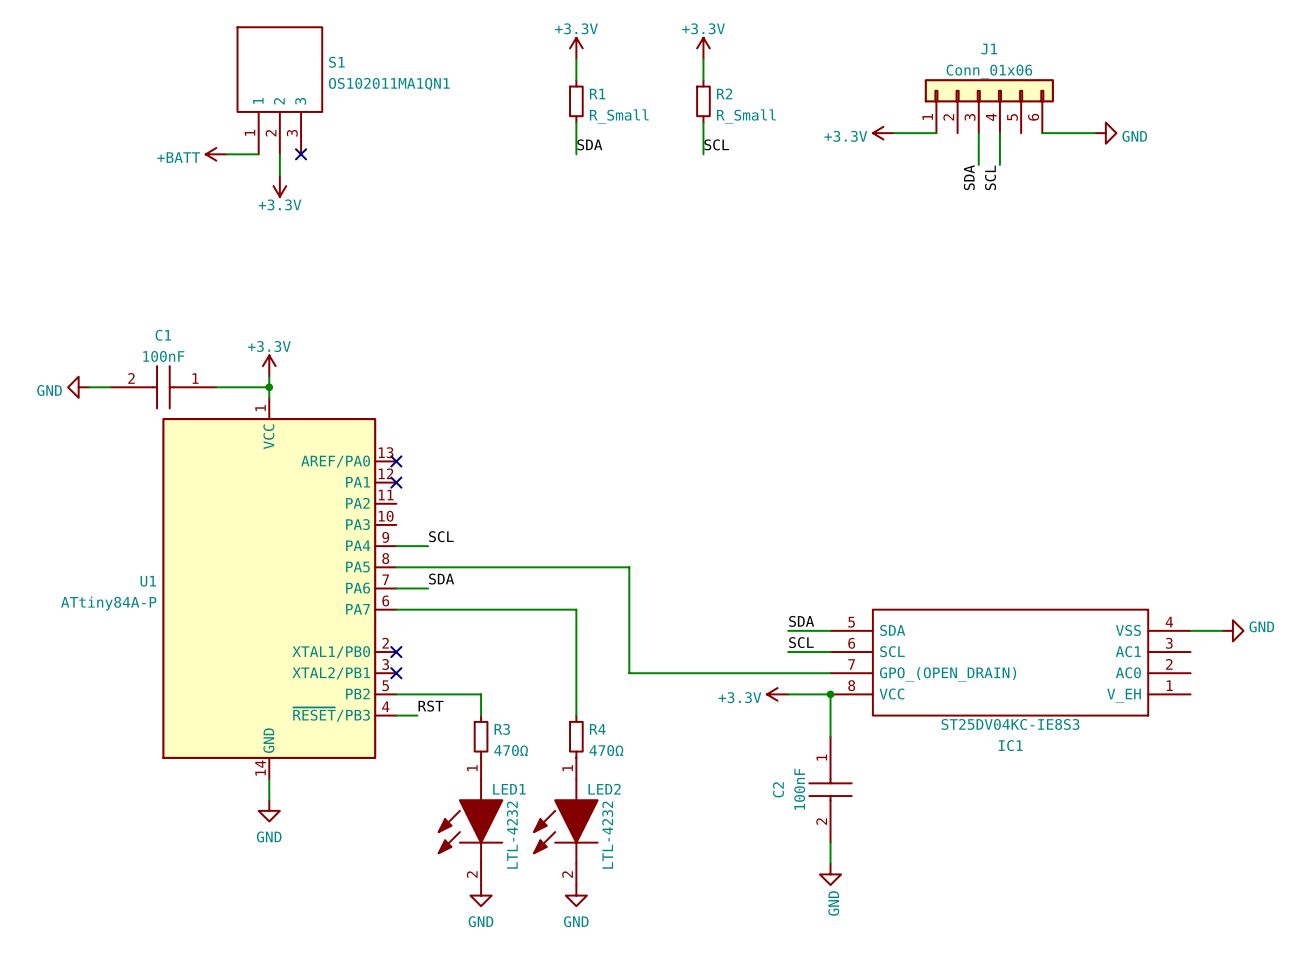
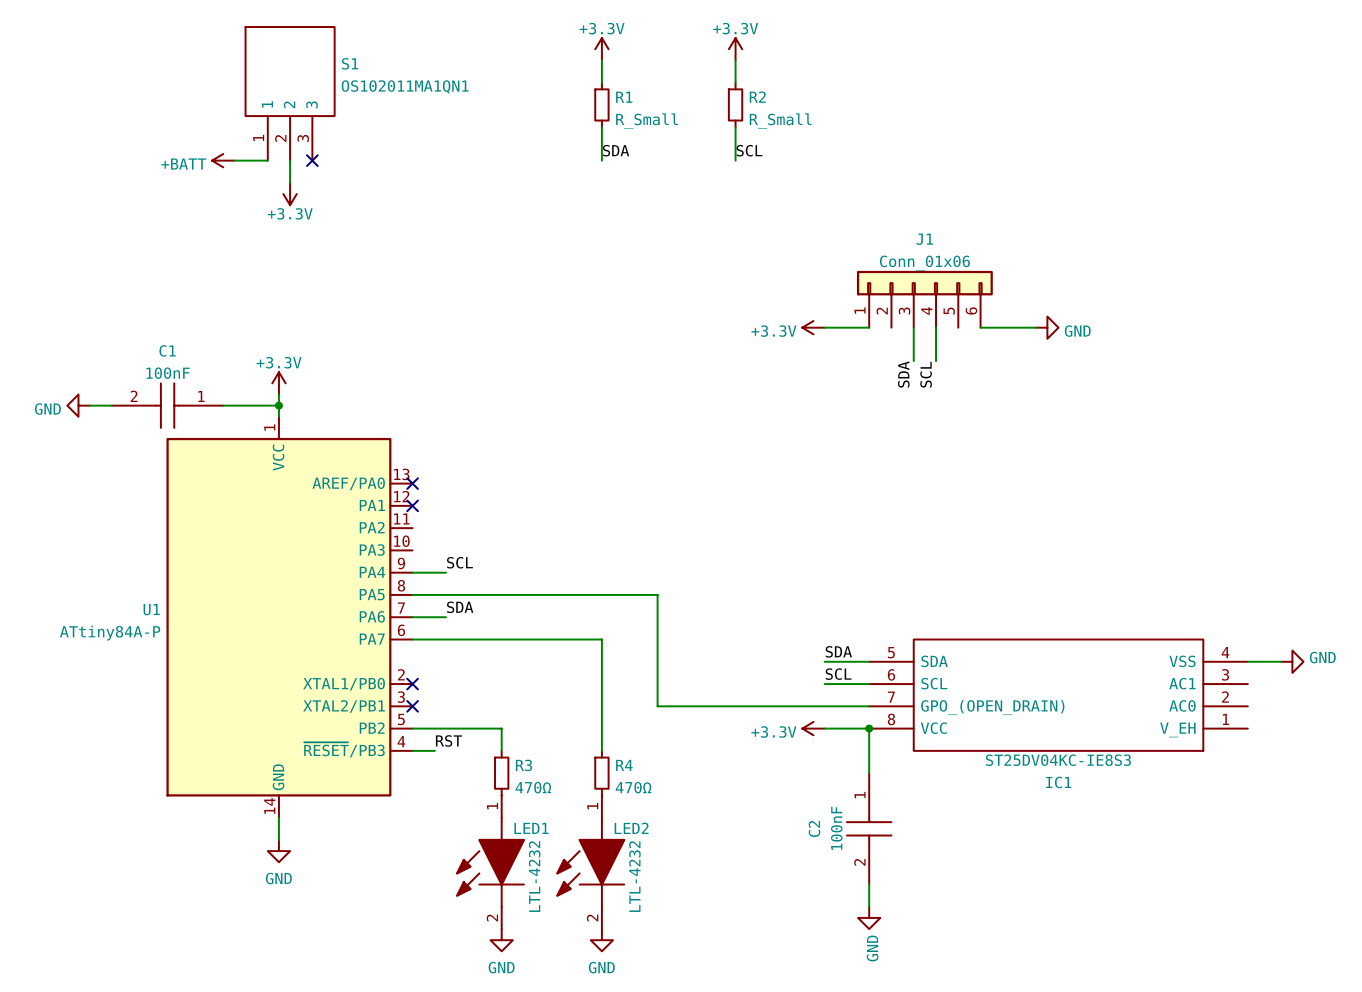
J1 position: (989, 106) -> (924, 299)
power symbol: +3.3V (883, 133) -> none
wire: (894, 133) (936, 133) -> none
wire: (978, 133) (978, 164) -> (936, 327) (936, 361)
wire: (999, 133) (999, 164) -> none
wire: (1042, 133) (1095, 133) -> none
power symbol: GND (1105, 133) -> none
label: SDA (969, 177) -> none
label: SCL (990, 177) -> none
power symbol: none -> +3.3V (813, 327)
wire: none -> (824, 327) (869, 327)
wire: none -> (913, 327) (913, 361)
wire: none -> (980, 327) (1036, 327)
power symbol: none -> GND (1047, 327)
label: none -> SDA (903, 374)
label: none -> SCL (926, 374)

